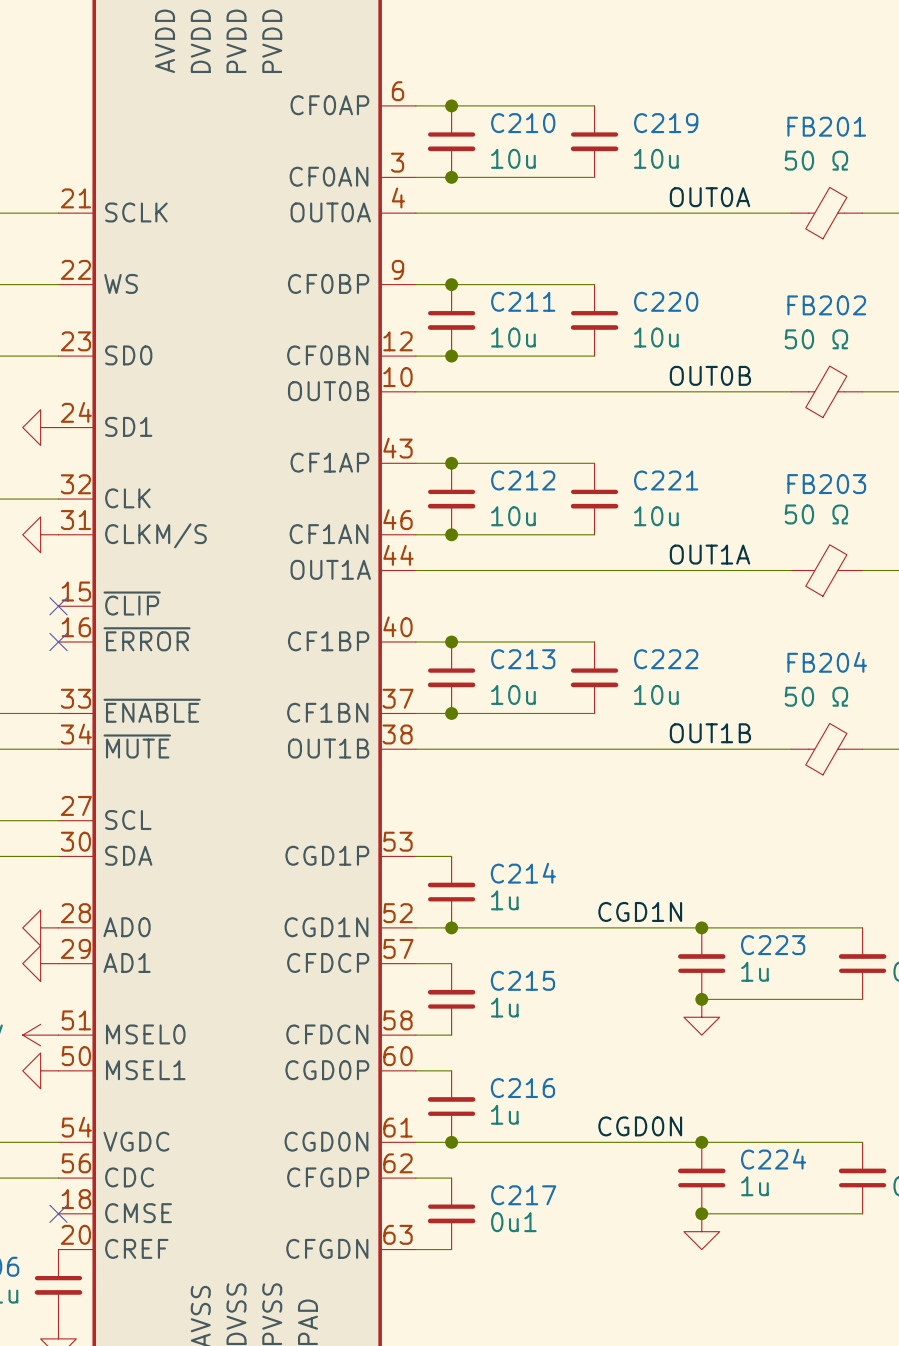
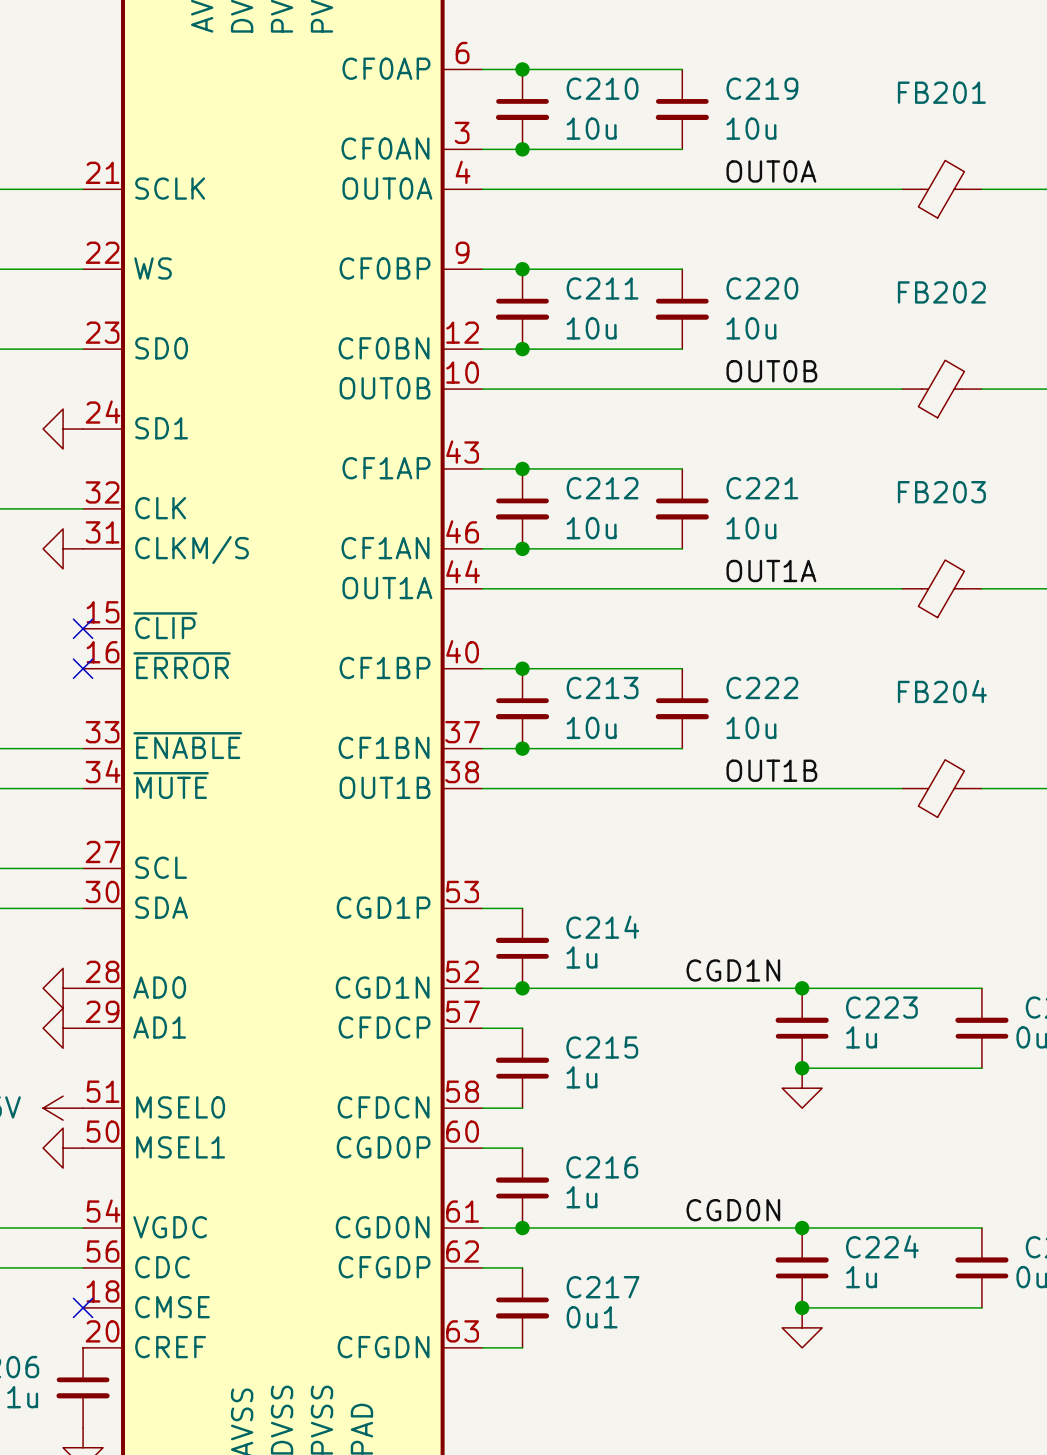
FB201 value: 50 Ω (816, 160) -> none
label position: OUT0A (710, 197) -> OUT0A (771, 171)
FB202 value: 50 Ω (816, 339) -> none
label position: OUT0B (710, 375) -> OUT0B (771, 371)
FB203 value: 50 Ω (816, 514) -> none
label position: OUT1A (710, 554) -> OUT1A (771, 570)
FB204 value: 50 Ω (816, 696) -> none
label position: OUT1B (710, 733) -> OUT1B (771, 770)

